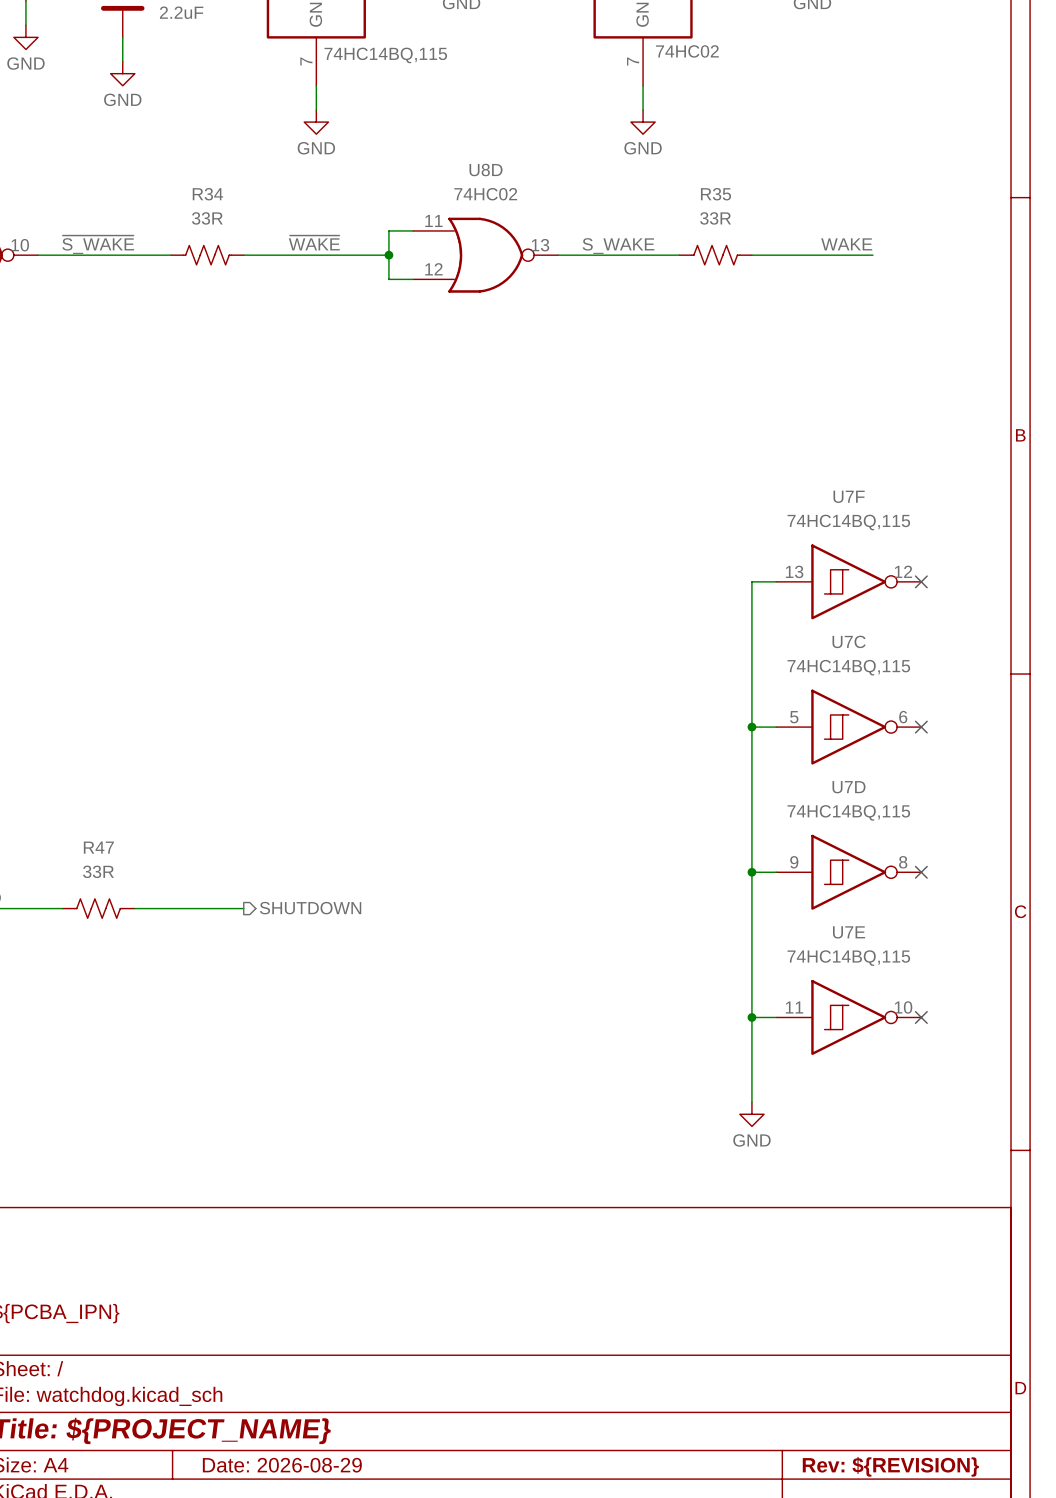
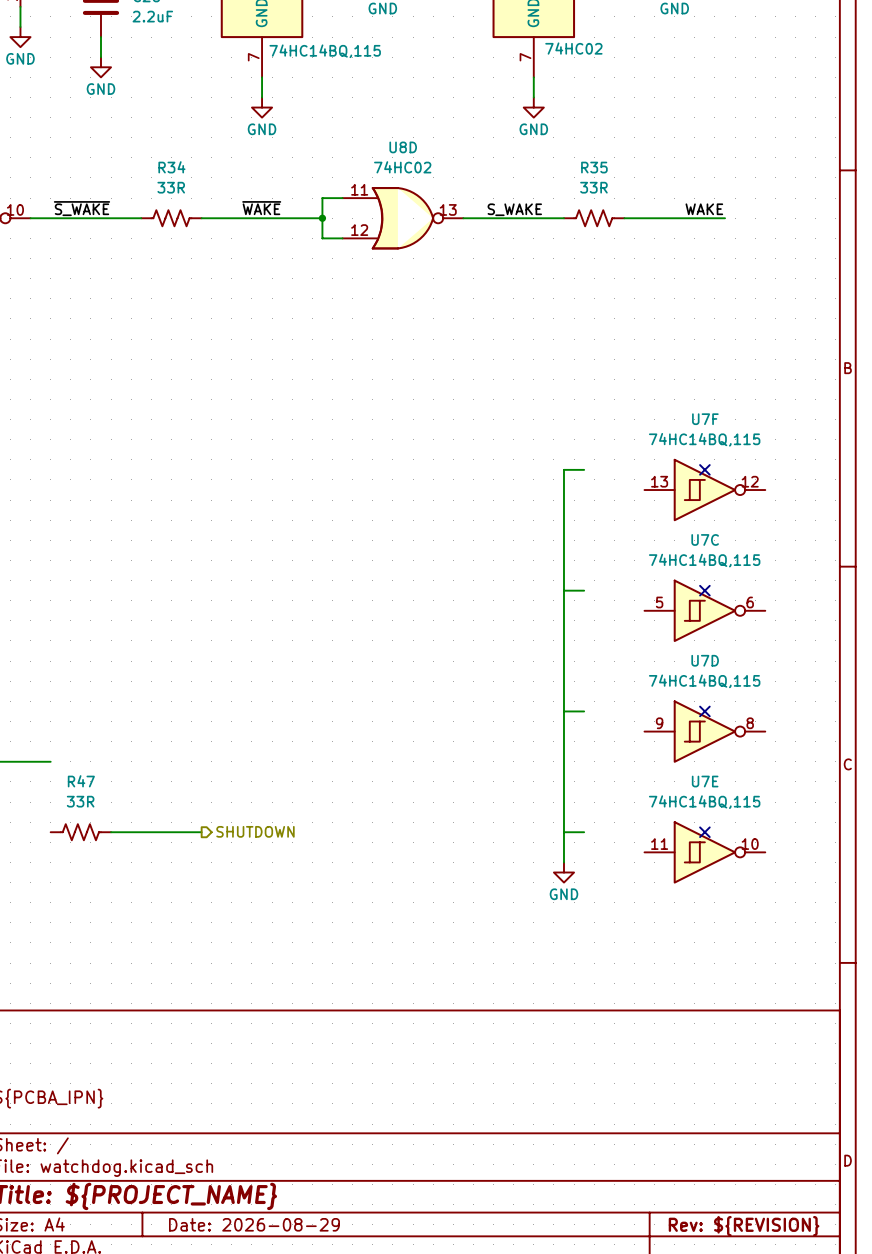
wire: none -> (584, 469) (563, 469) (563, 862)
no-connect mark: none -> (704, 469)
wire: (776, 581) (751, 581) (751, 1102) -> none
no-connect mark: (921, 581) -> none
no-connect mark: none -> (704, 590)
wire: (751, 727) (776, 727) -> (563, 590) (584, 590)
junction: (751, 727) -> none
no-connect mark: (921, 727) -> none
no-connect mark: none -> (704, 711)
wire: (751, 872) (776, 872) -> (563, 711) (584, 711)
junction: (751, 872) -> none
no-connect mark: (921, 872) -> none
R47 position: (98, 908) -> (80, 832)
wire: (134, 908) (243, 908) -> (111, 832) (201, 832)
hierarchical label position: SHUTDOWN (310, 908) -> SHUTDOWN (255, 831)
no-connect mark: none -> (704, 832)
wire: (751, 1017) (776, 1017) -> (563, 832) (584, 832)
junction: (751, 1017) -> none
no-connect mark: (921, 1017) -> none
power symbol position: GND (751, 1114) -> GND (563, 872)

